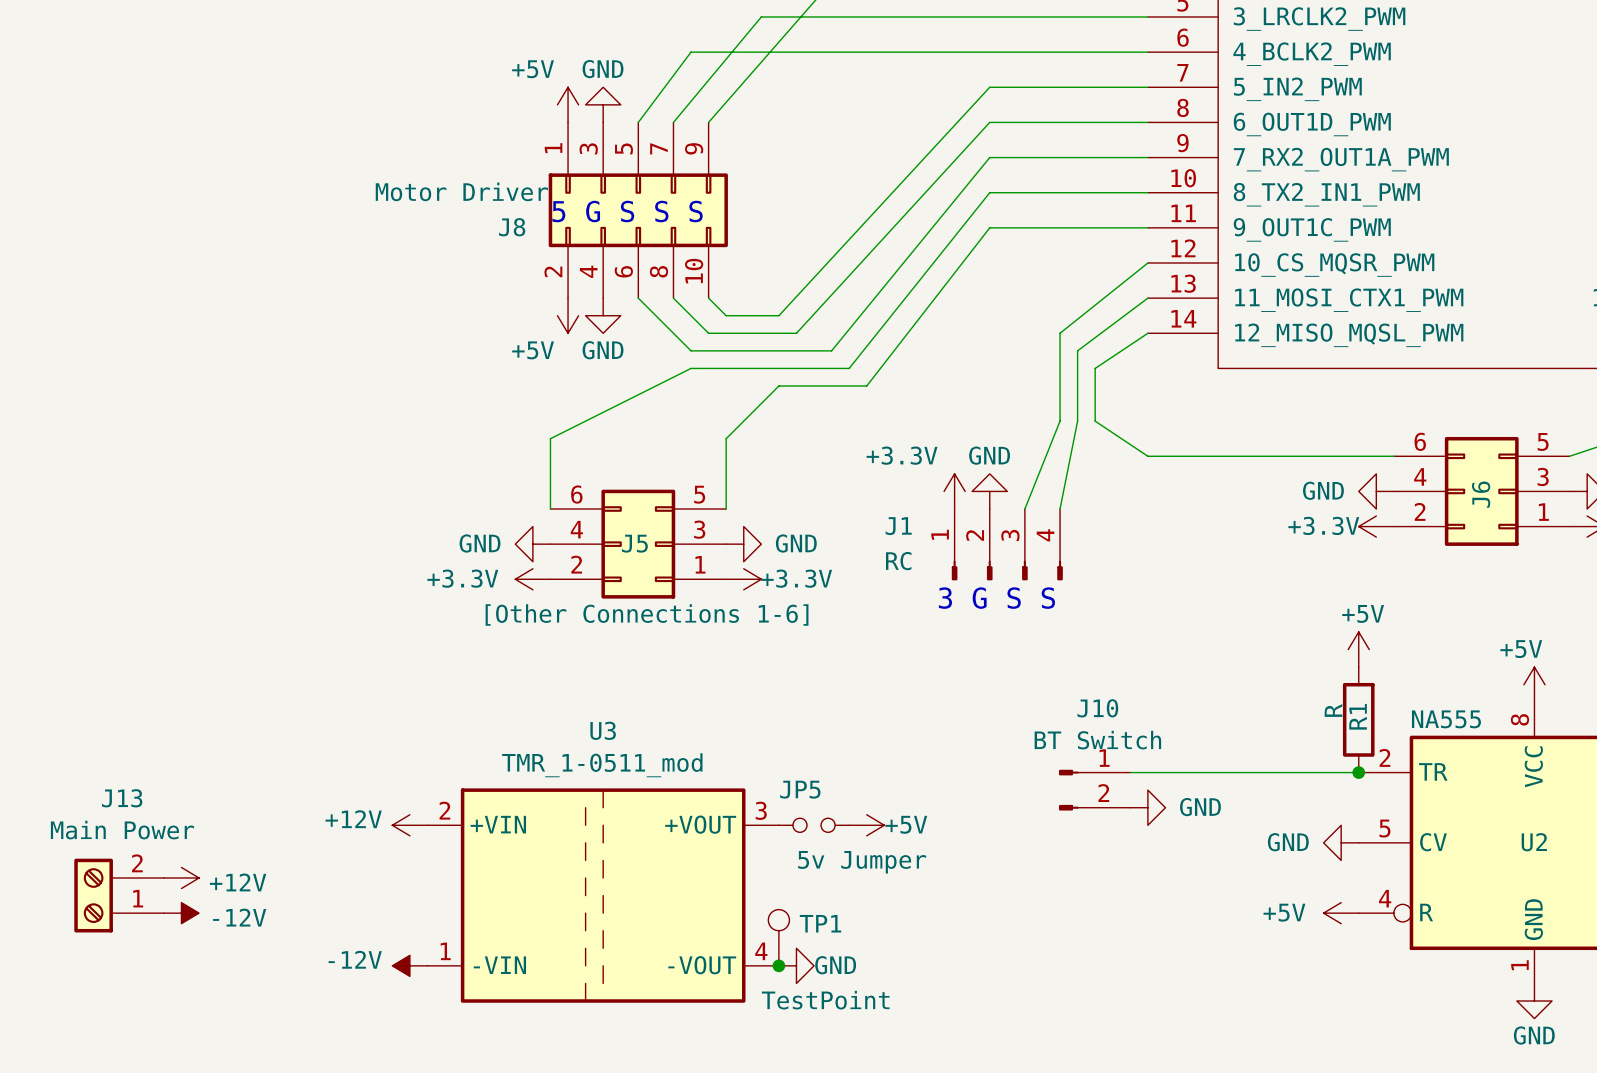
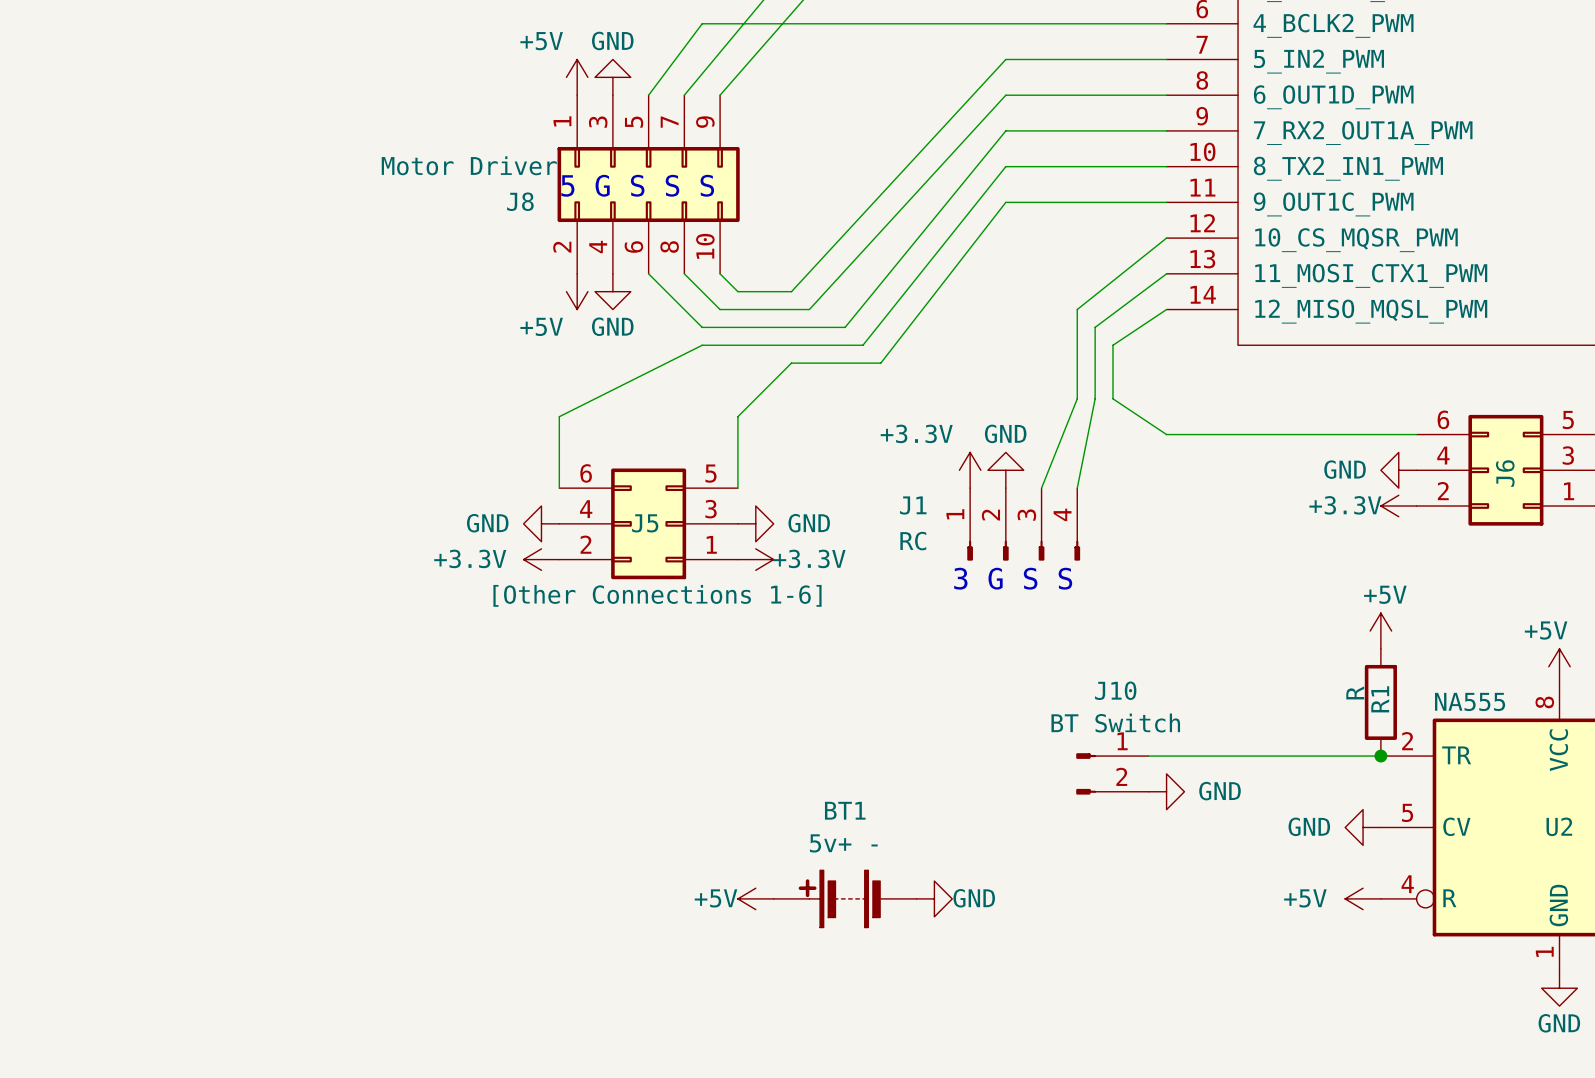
power symbol: +12V (409, 825) -> none
JP5: 5v Jumper (814, 825) -> none
power symbol rotation: 0° (866, 825) -> 180° (755, 898)
power symbol position: +5V (866, 825) -> +5V (755, 898)
power symbol: +12V (181, 878) -> none
J13: Main Power (119, 895) -> none
U3: TMR_1-0511_mod (603, 895) -> none
power symbol: -12V (181, 913) -> none
BT1: none -> 5v+ - (845, 898)
TP1: TestPoint (778, 937) -> none
power symbol: -12V (409, 965) -> none
junction: (778, 965) -> none
power symbol position: GND (796, 965) -> GND (934, 898)

